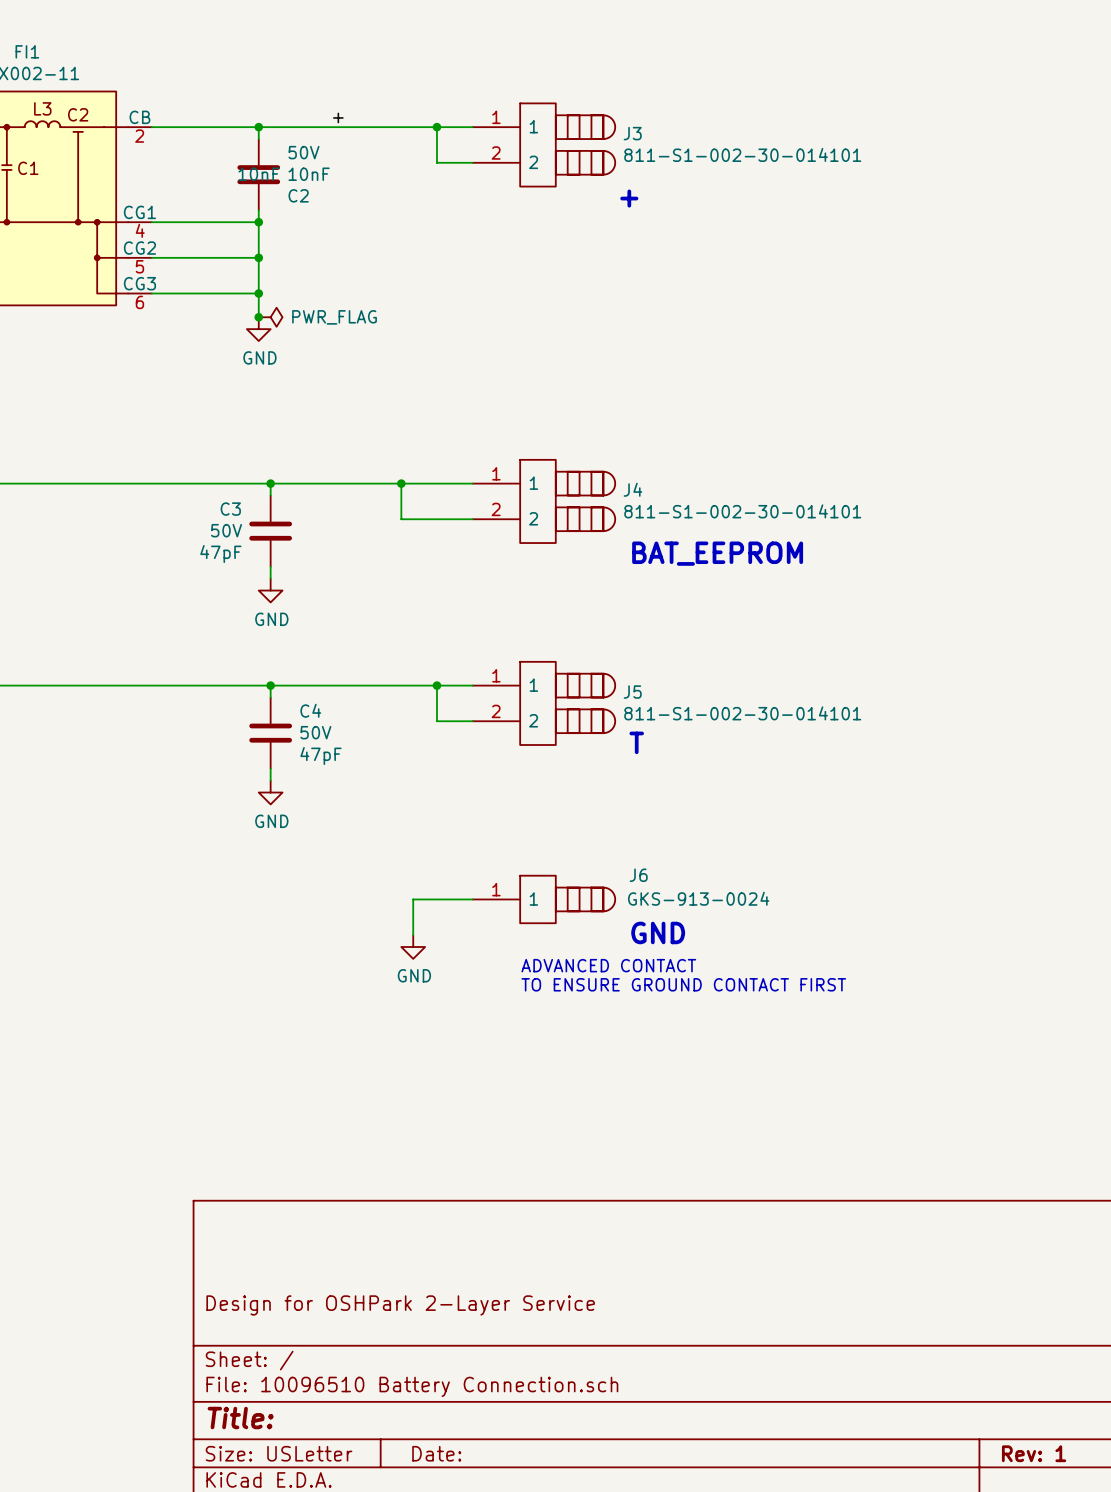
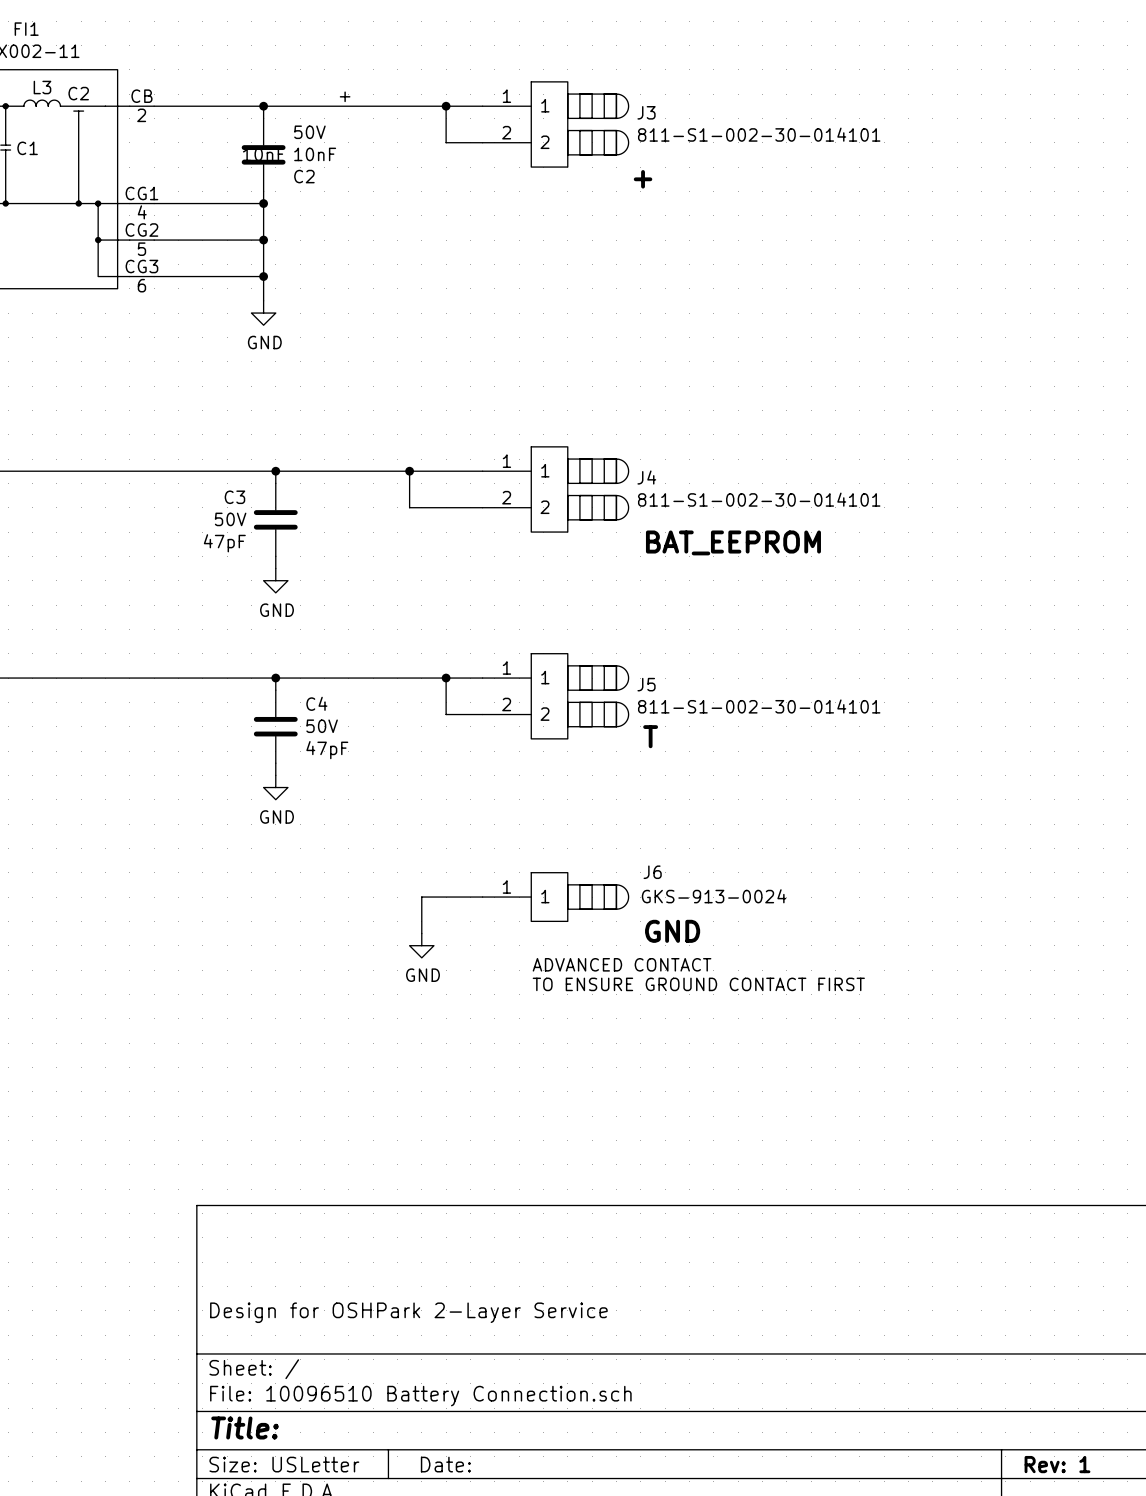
junction: (258, 317) -> none
power symbol: PWR_FLAG (270, 317) -> none

